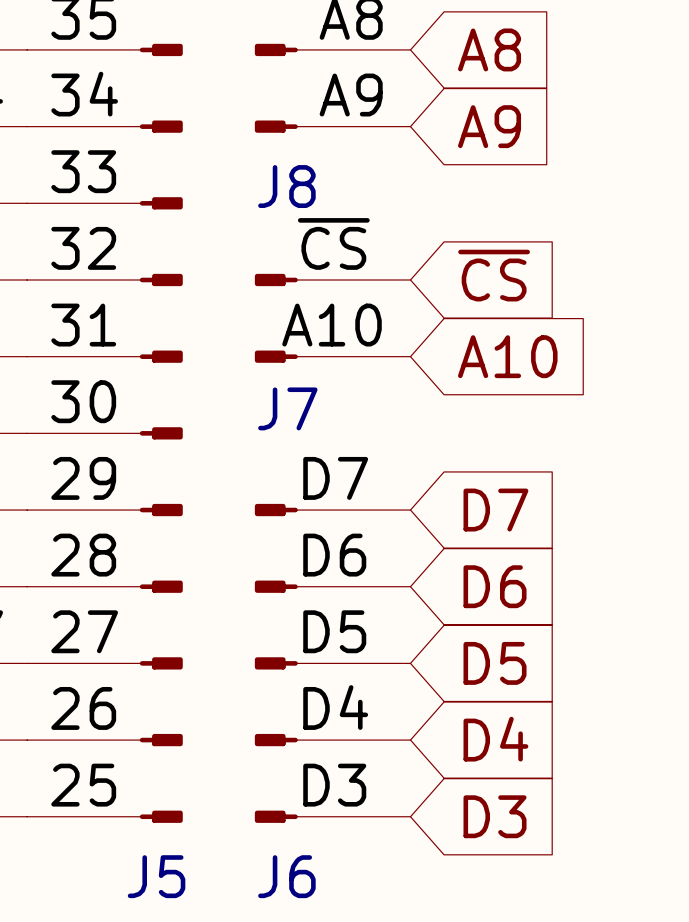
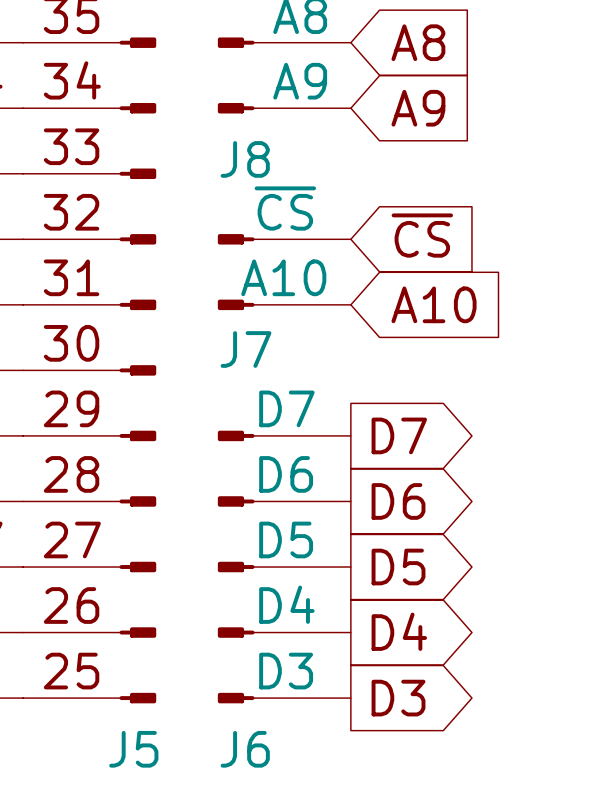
global label shape: input (495, 510) -> output (399, 435)
global label shape: input (495, 586) -> output (398, 501)
global label shape: input (495, 663) -> output (398, 567)
global label shape: input (495, 739) -> output (399, 631)
global label shape: input (495, 816) -> output (398, 698)

